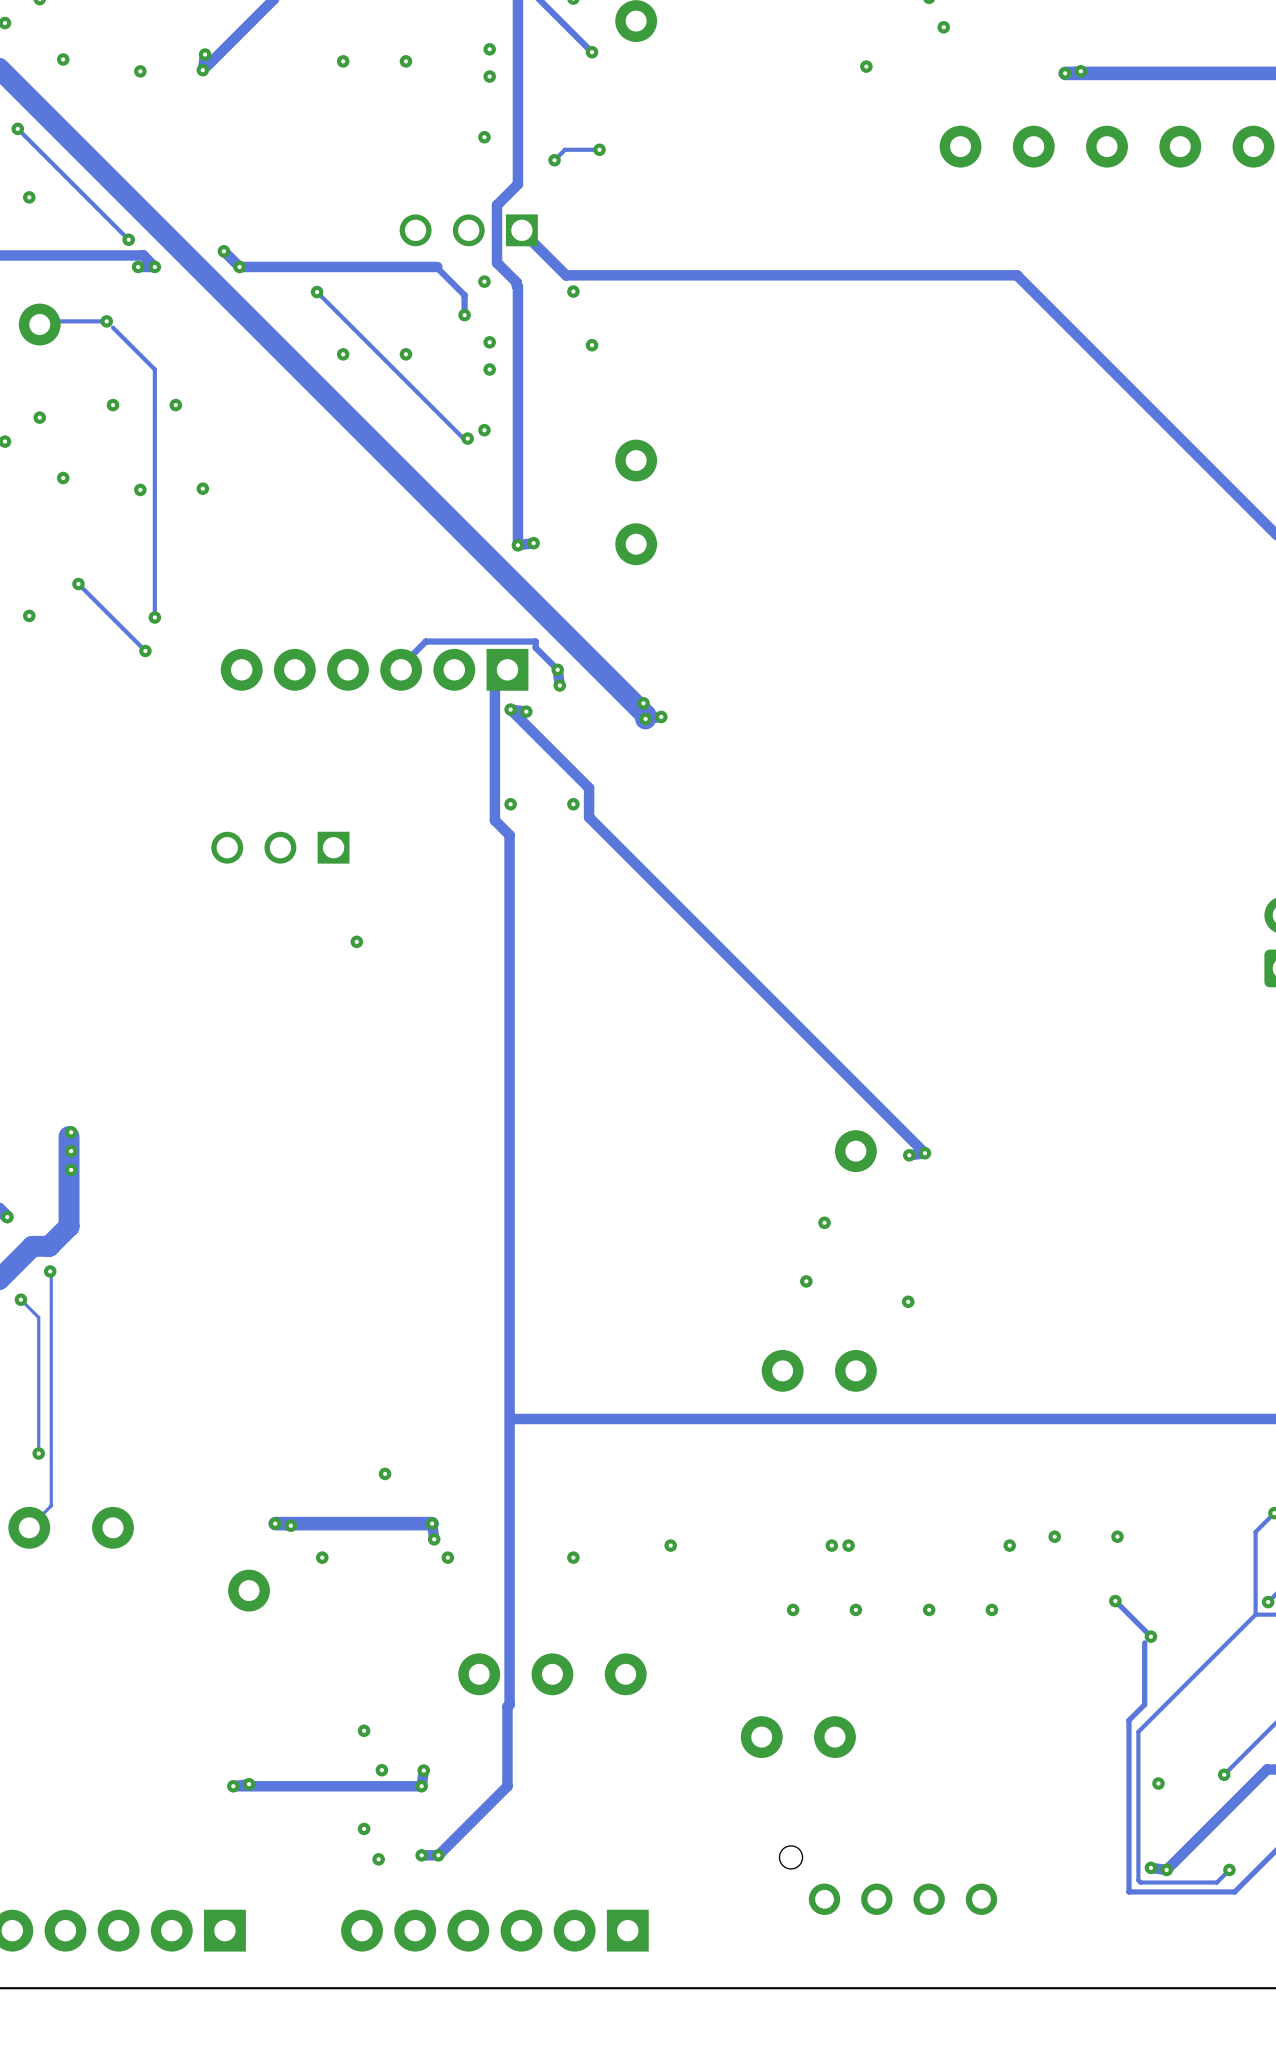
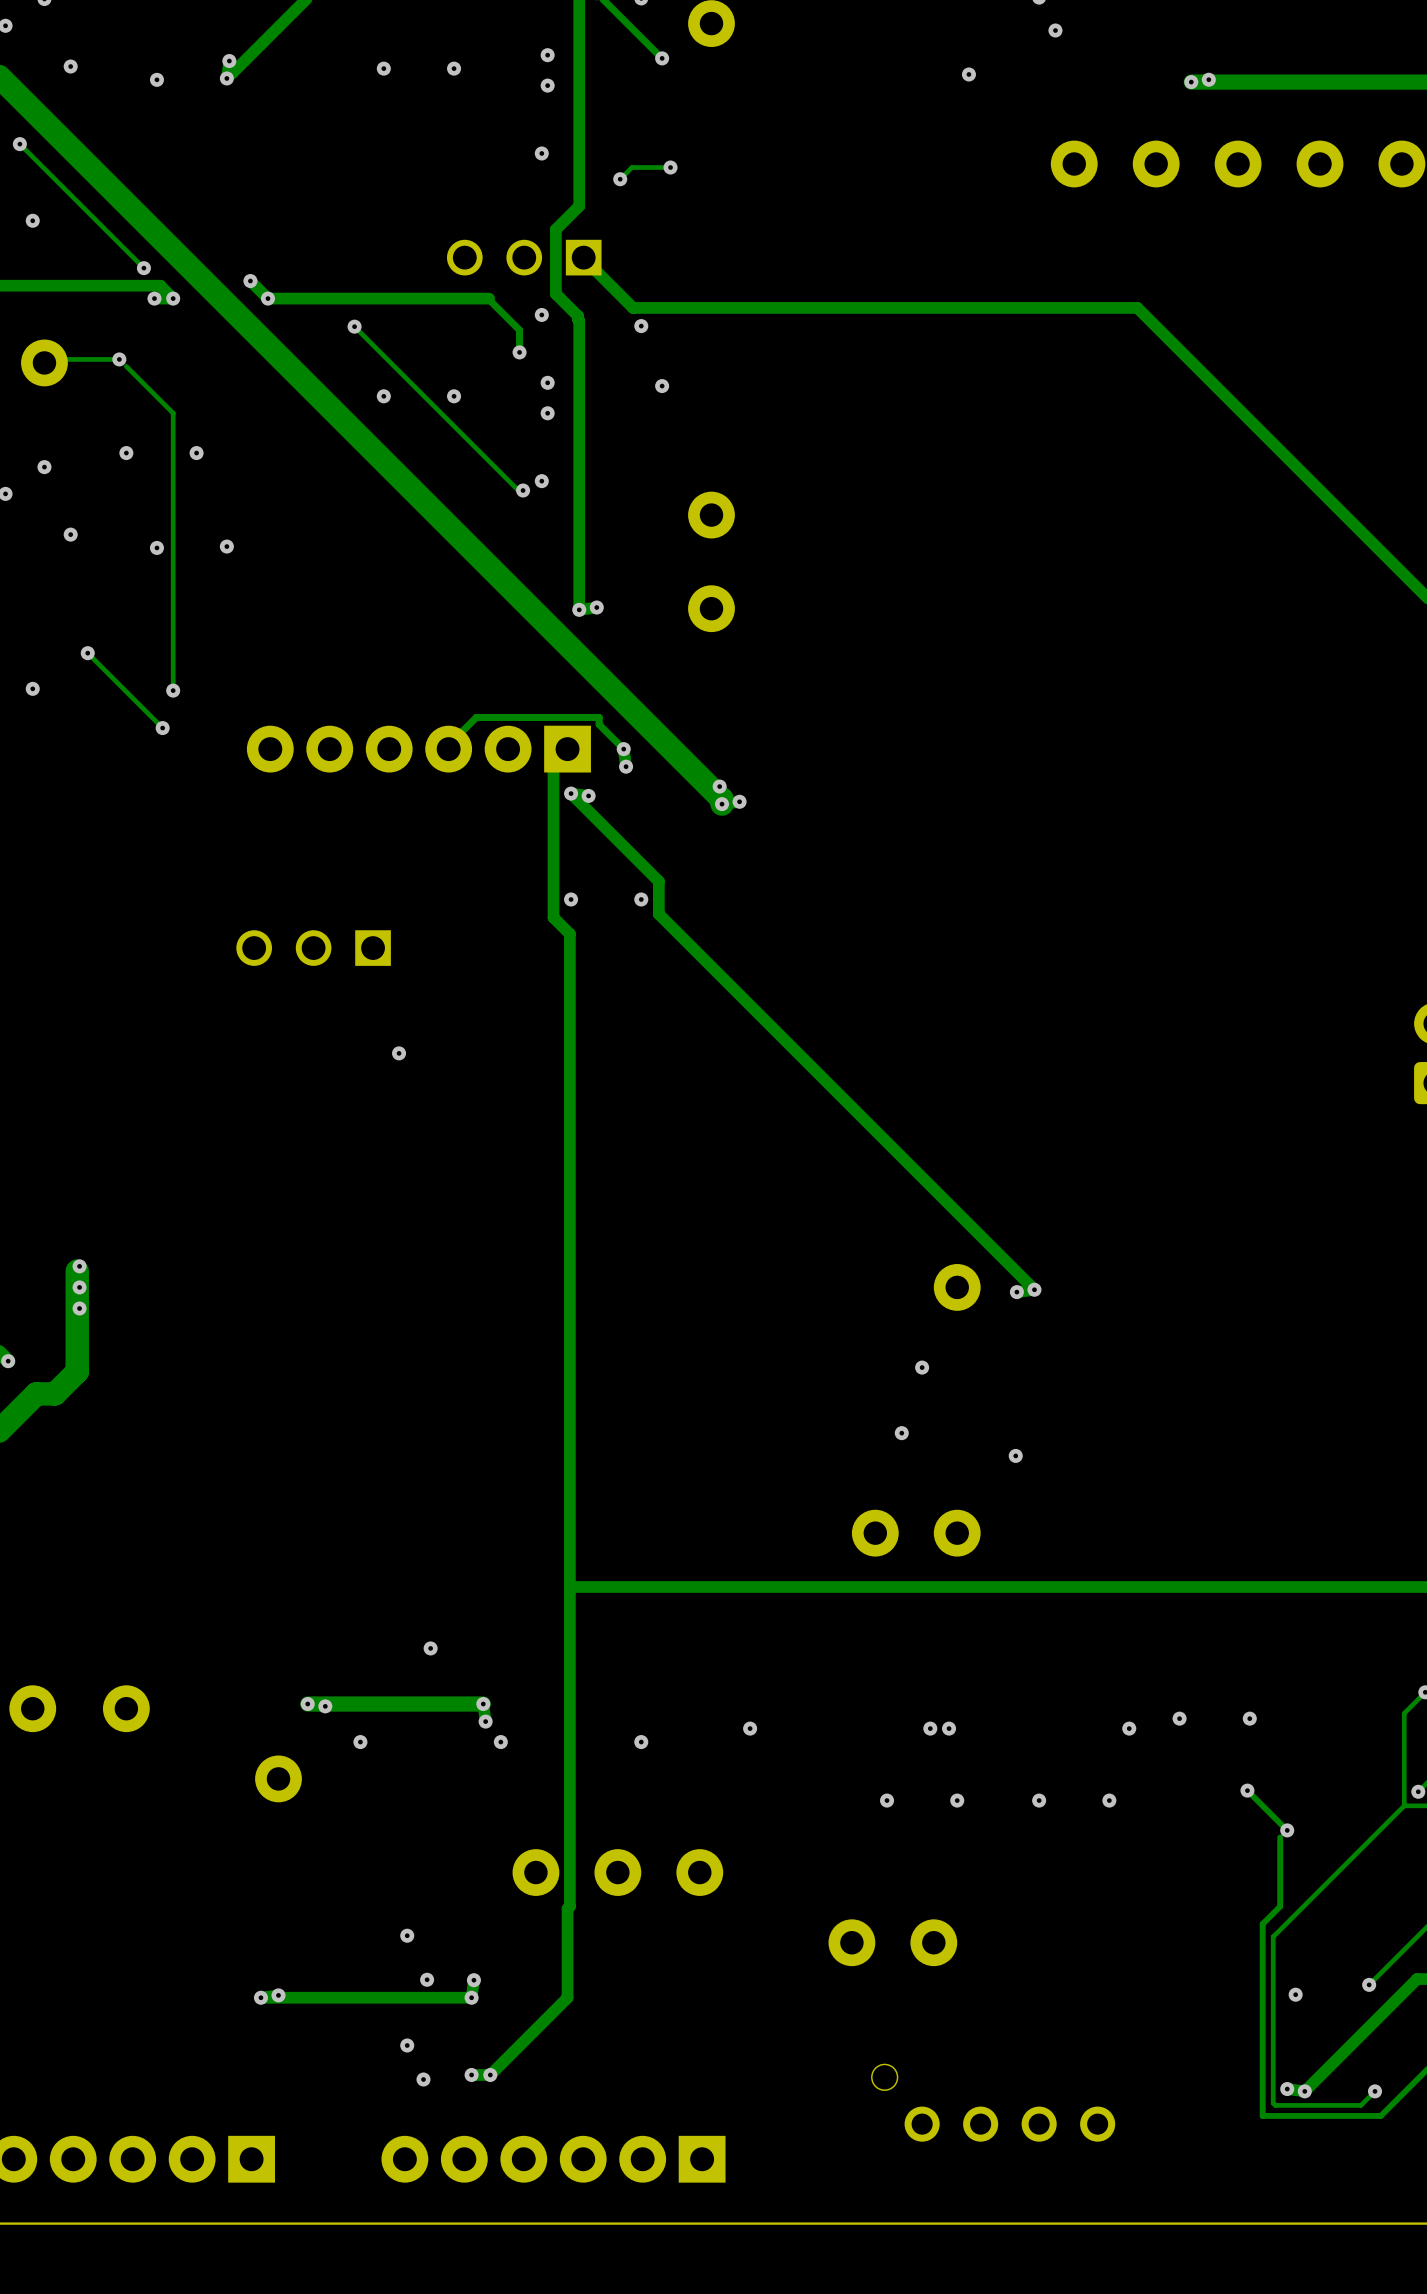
track: (50, 1271) (51, 1505) (30, 1526) -> none
via: (50, 1271) -> none
track: (20, 1299) (38, 1317) (38, 1453) -> none
via: (20, 1299) -> none
via: (38, 1453) -> none

